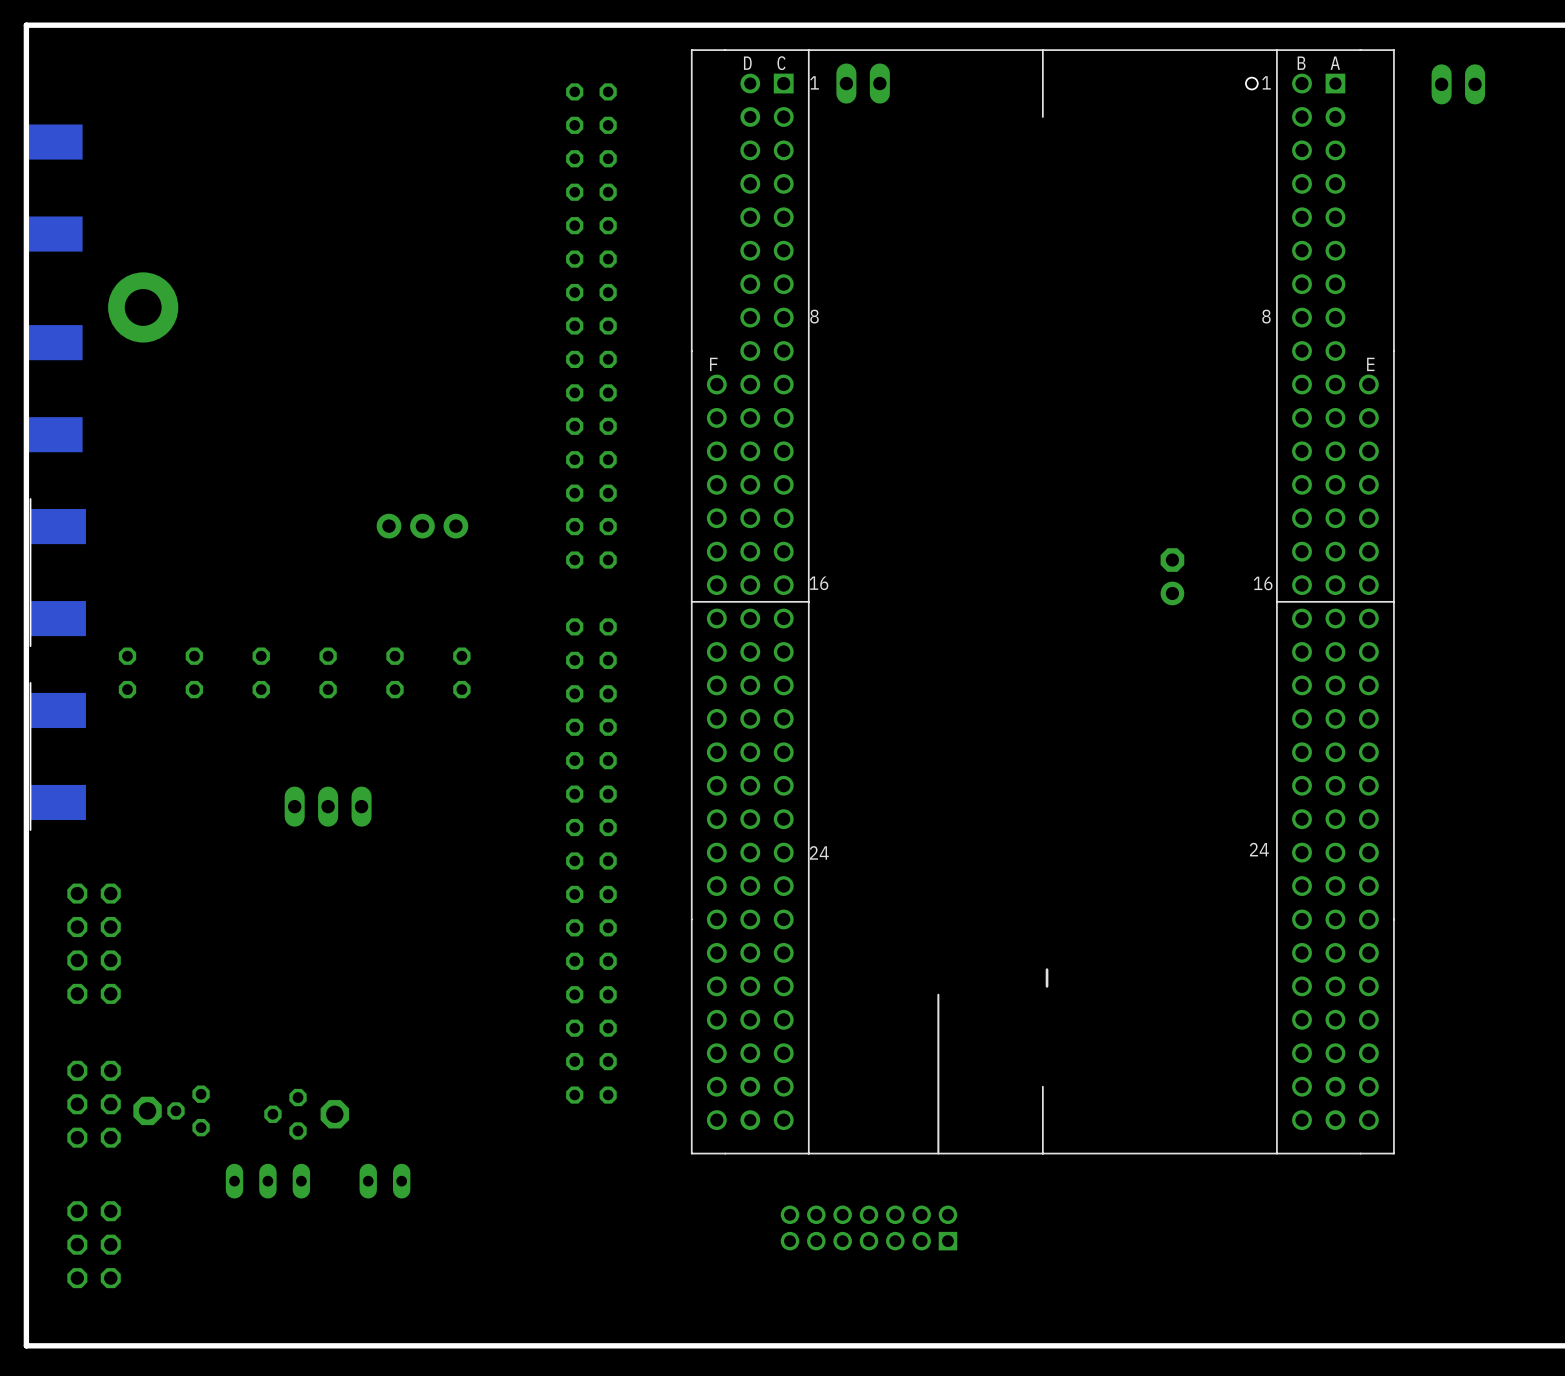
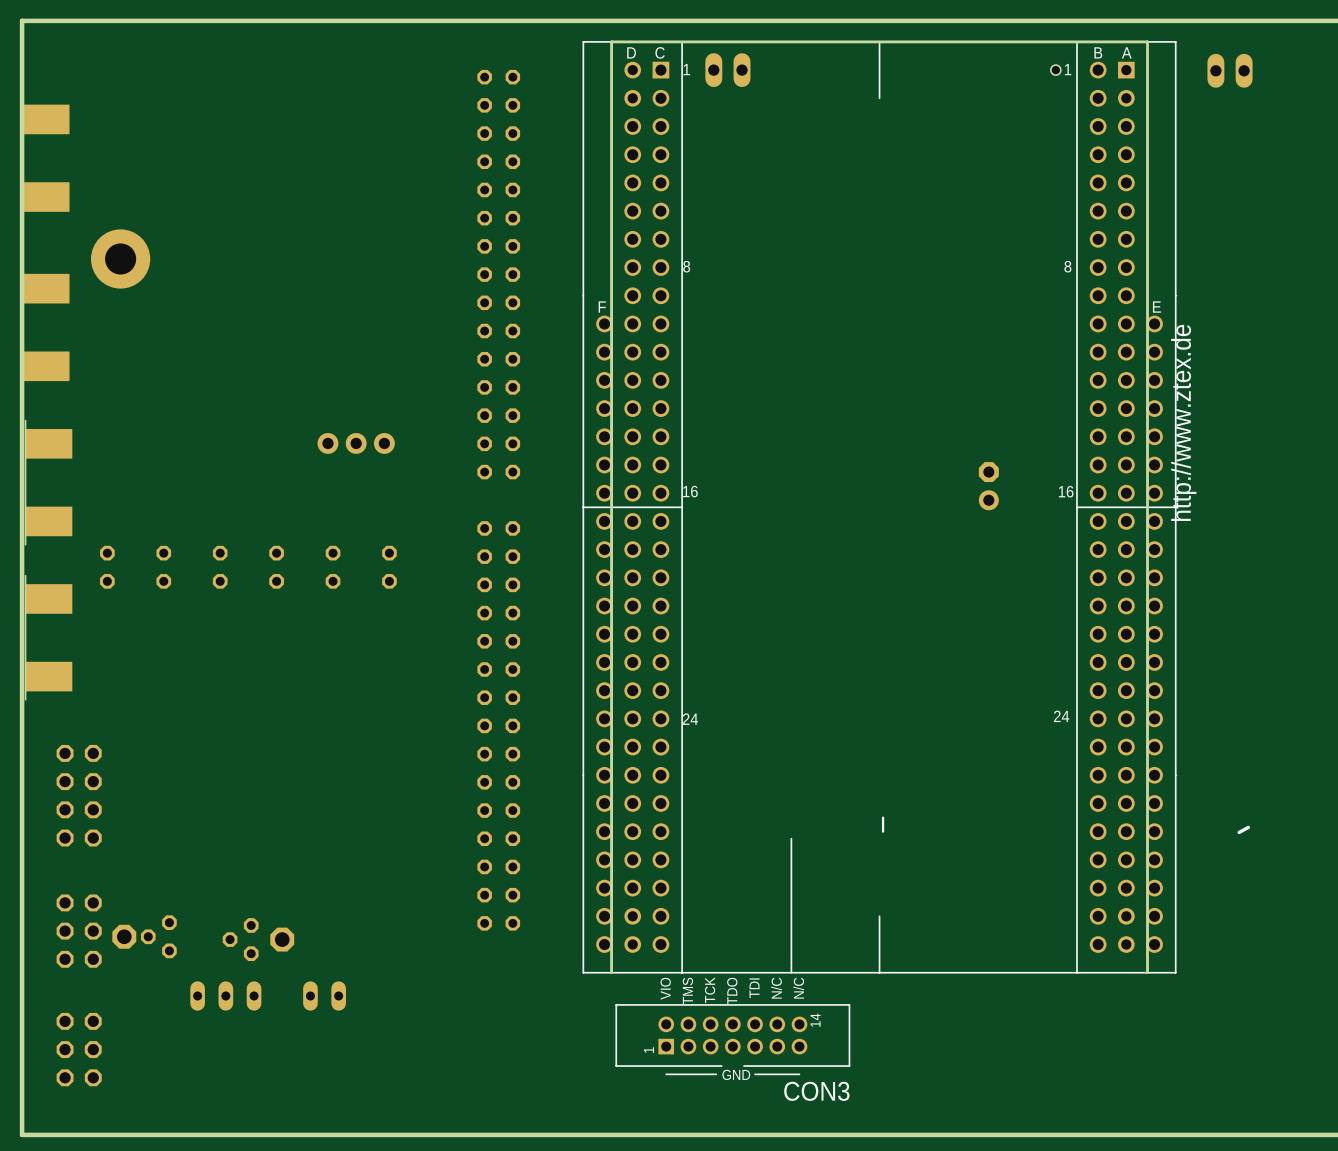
text: none -> http://www.ztex.de (1183, 422)
part: (328, 806) -> none
line: none -> (1248, 827) (1239, 832)
board edge: none -> (1147, 972) (1147, 41) (611, 41) (611, 972)
CON3 side: top (868, 1227) -> bottom (732, 1039)

